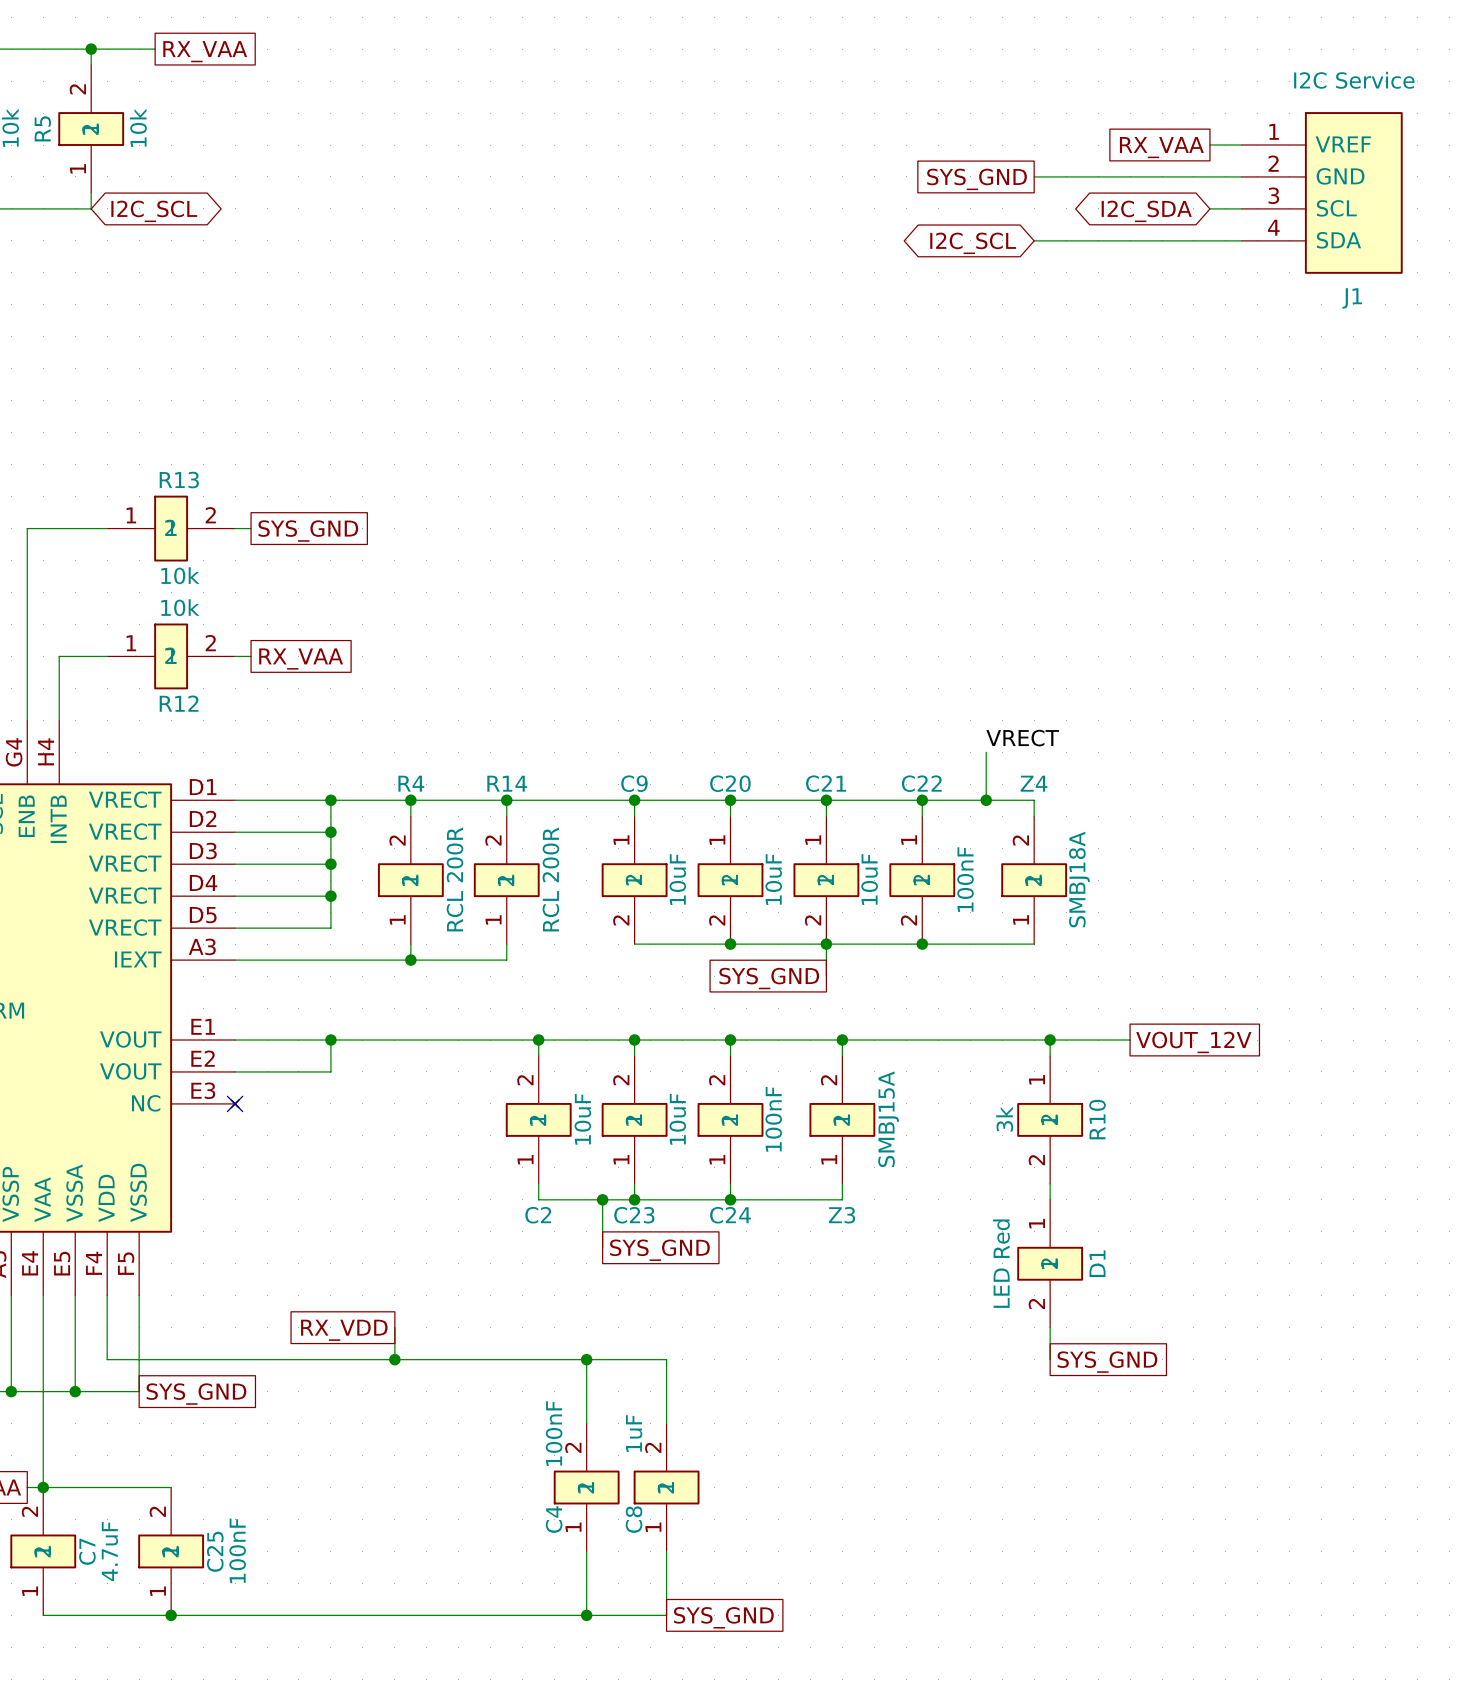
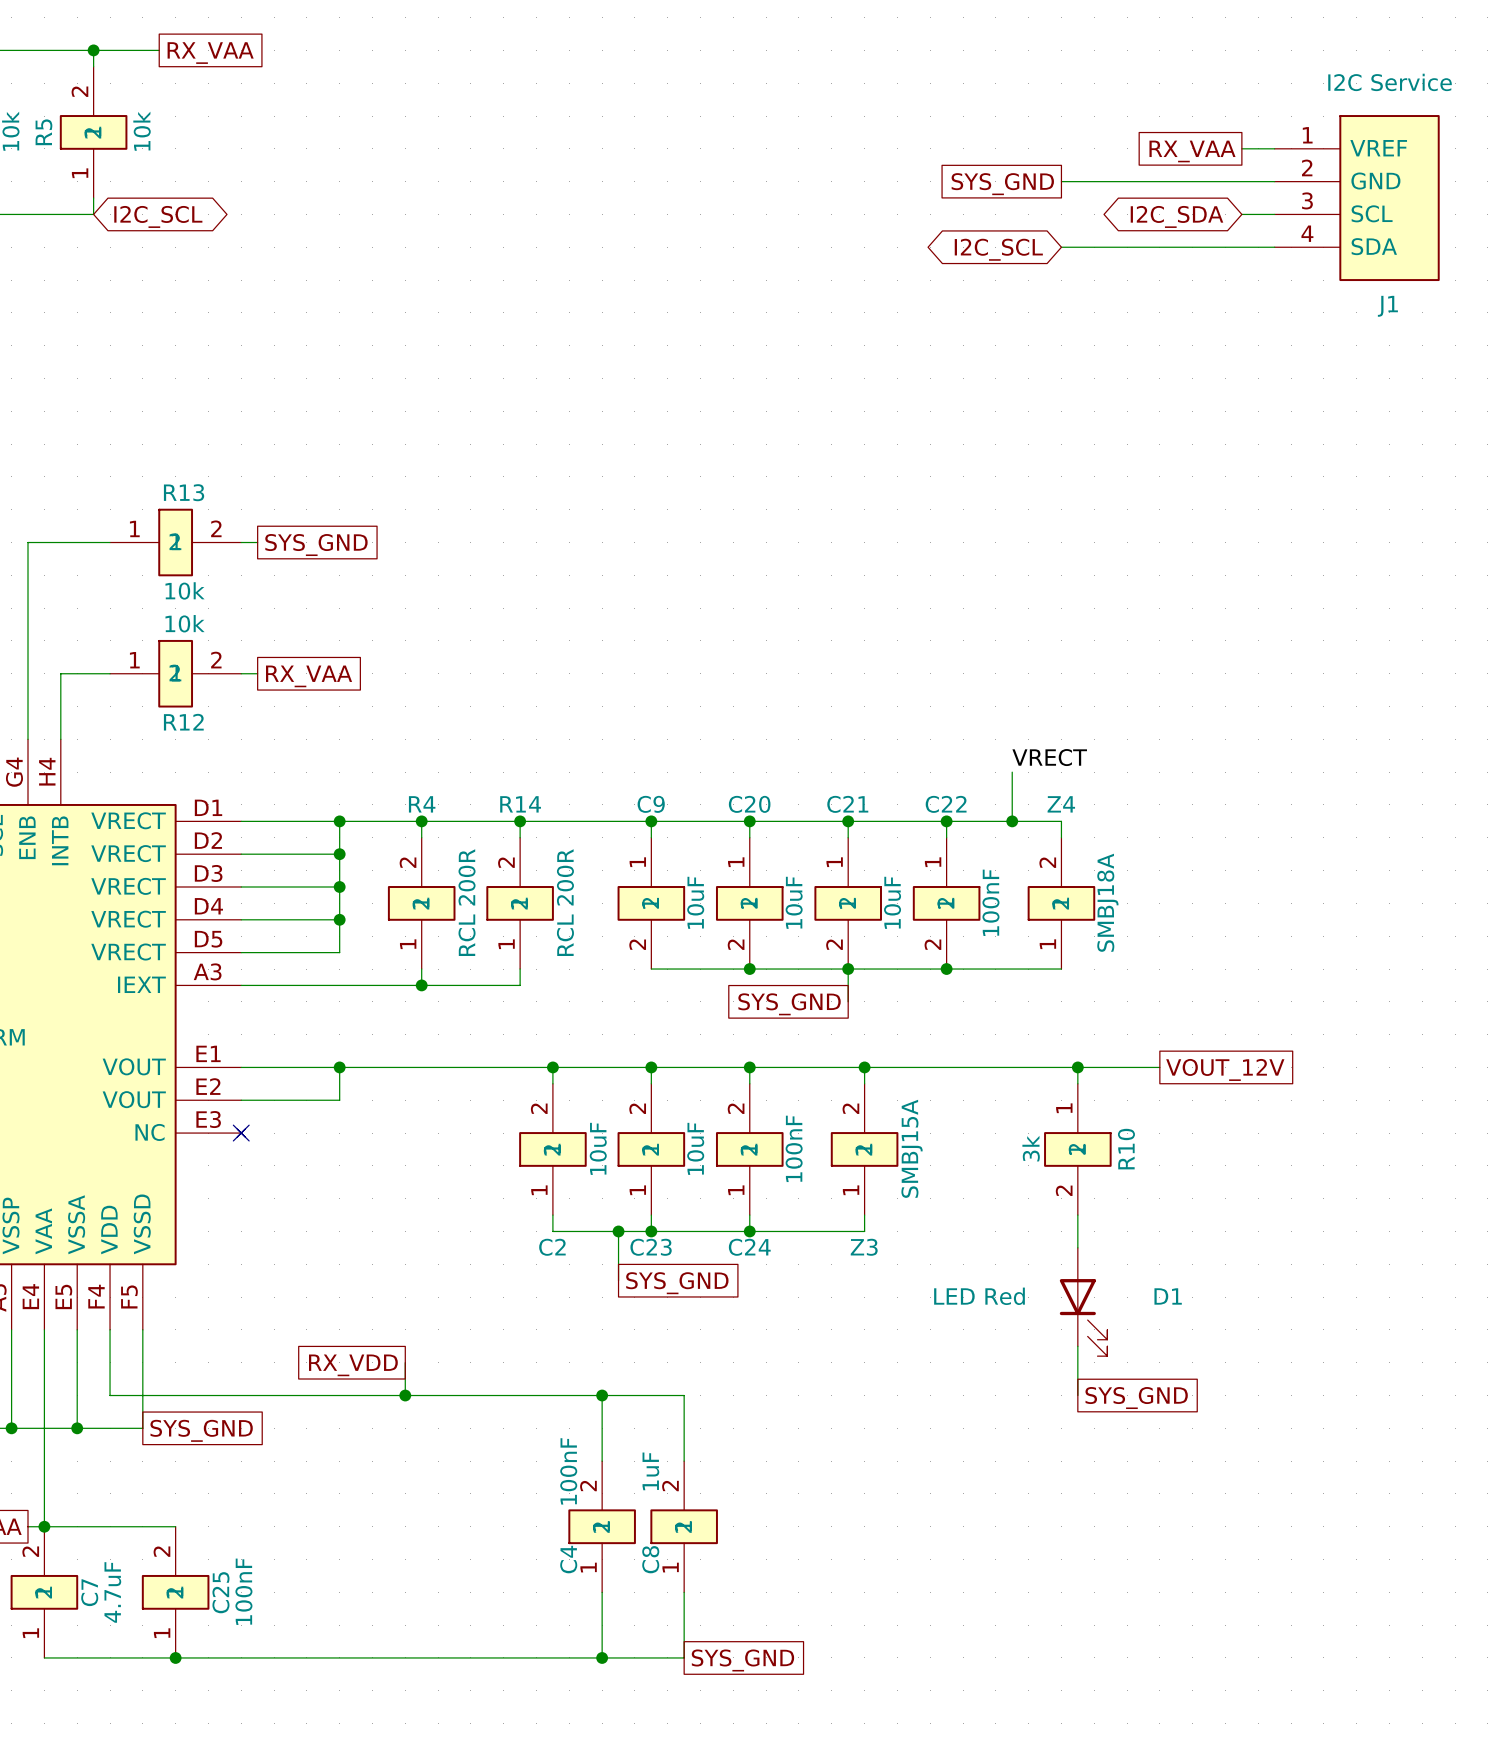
D1 symbol: [1017, 1199, 1084, 1328] -> [1059, 1247, 1108, 1357]
D1 value position: LED Red (1001, 1263) -> LED Red (979, 1296)
D1 name position: D1 (1097, 1263) -> D1 (1168, 1296)

